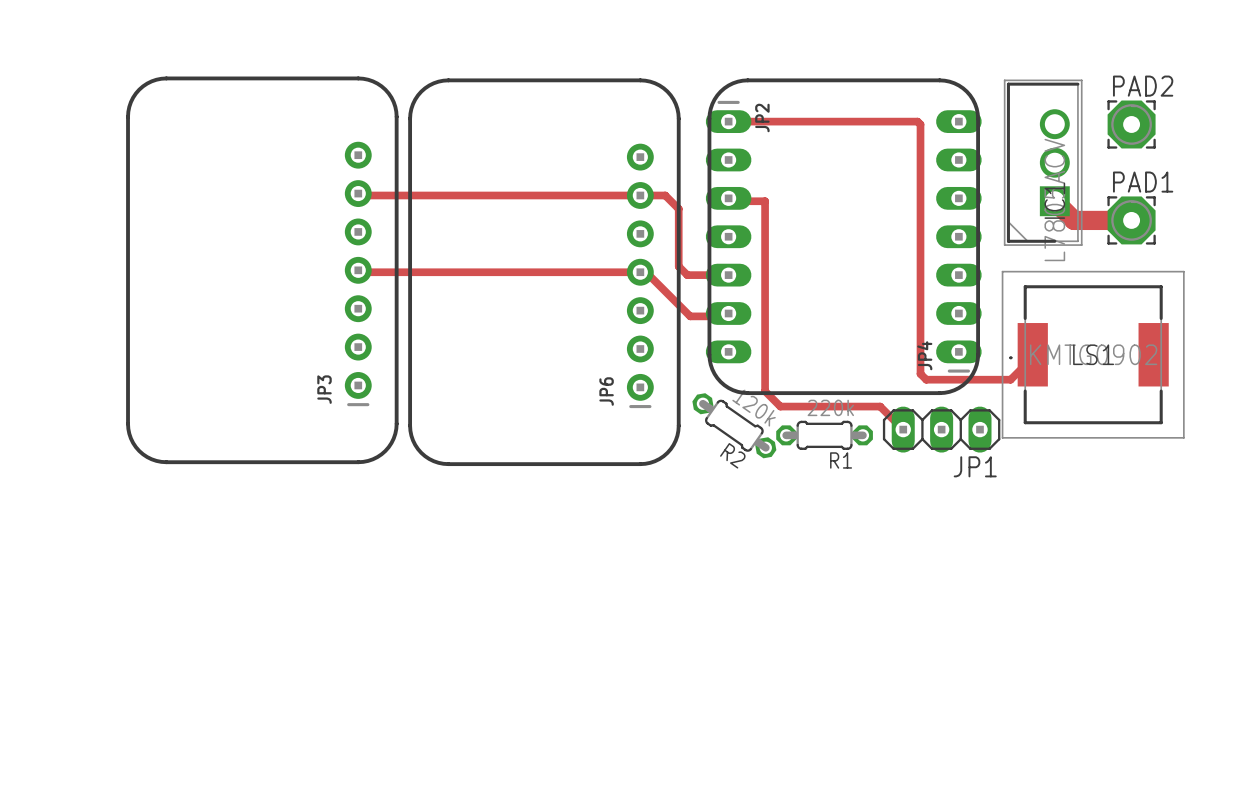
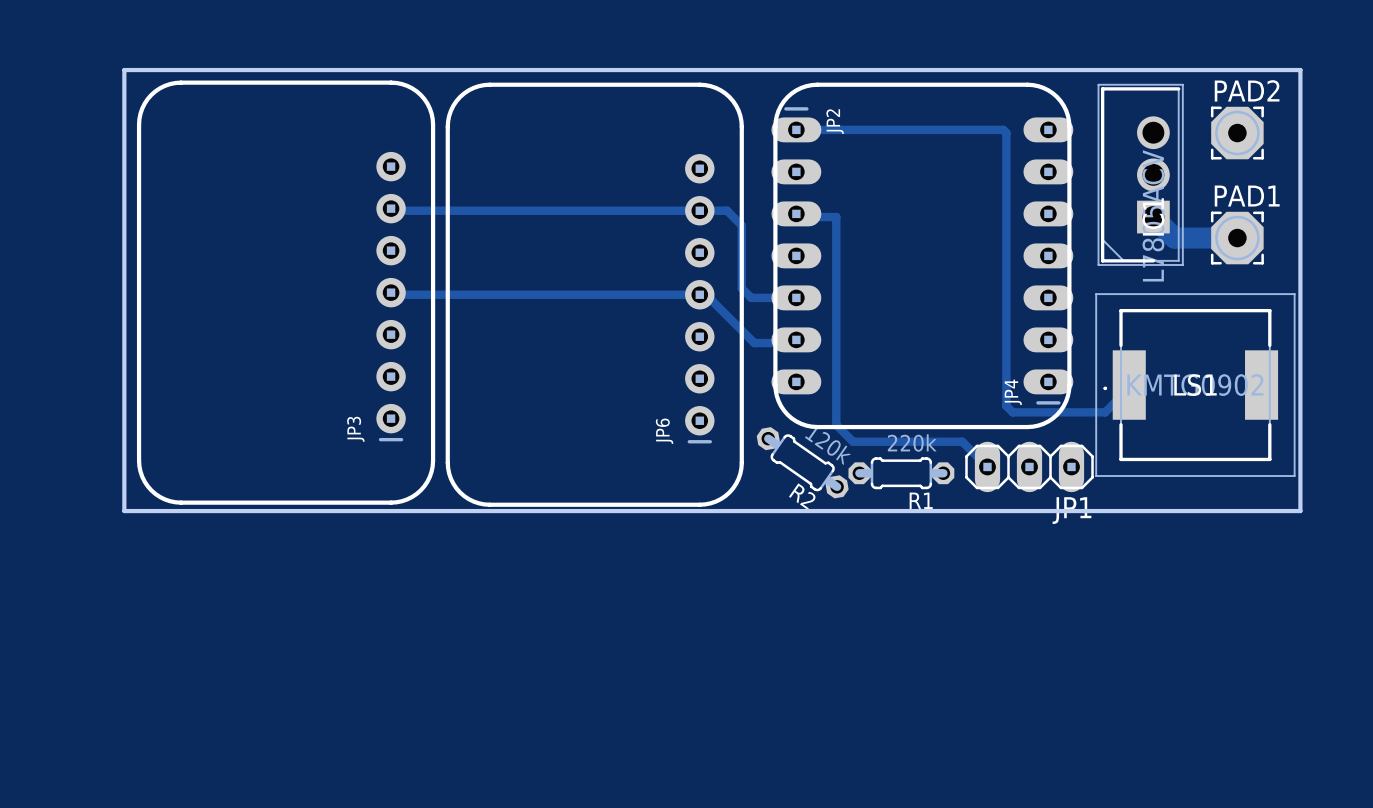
board edge: none -> (124, 70) (124, 511) (1300, 511) (1300, 70) (124, 70)

